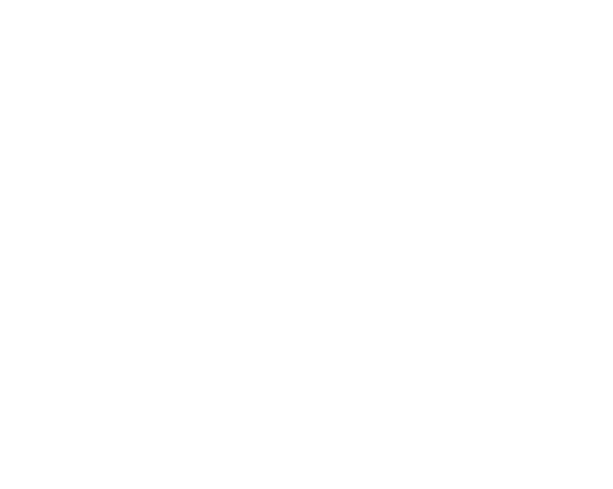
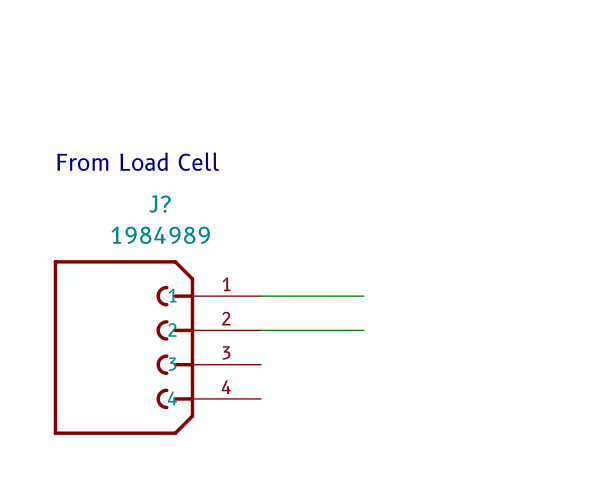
text: none -> From Load Cell (138, 161)
wire: none -> (261, 296) (363, 296)
wire: none -> (261, 330) (363, 330)
J?: none -> 1984989 (157, 347)

